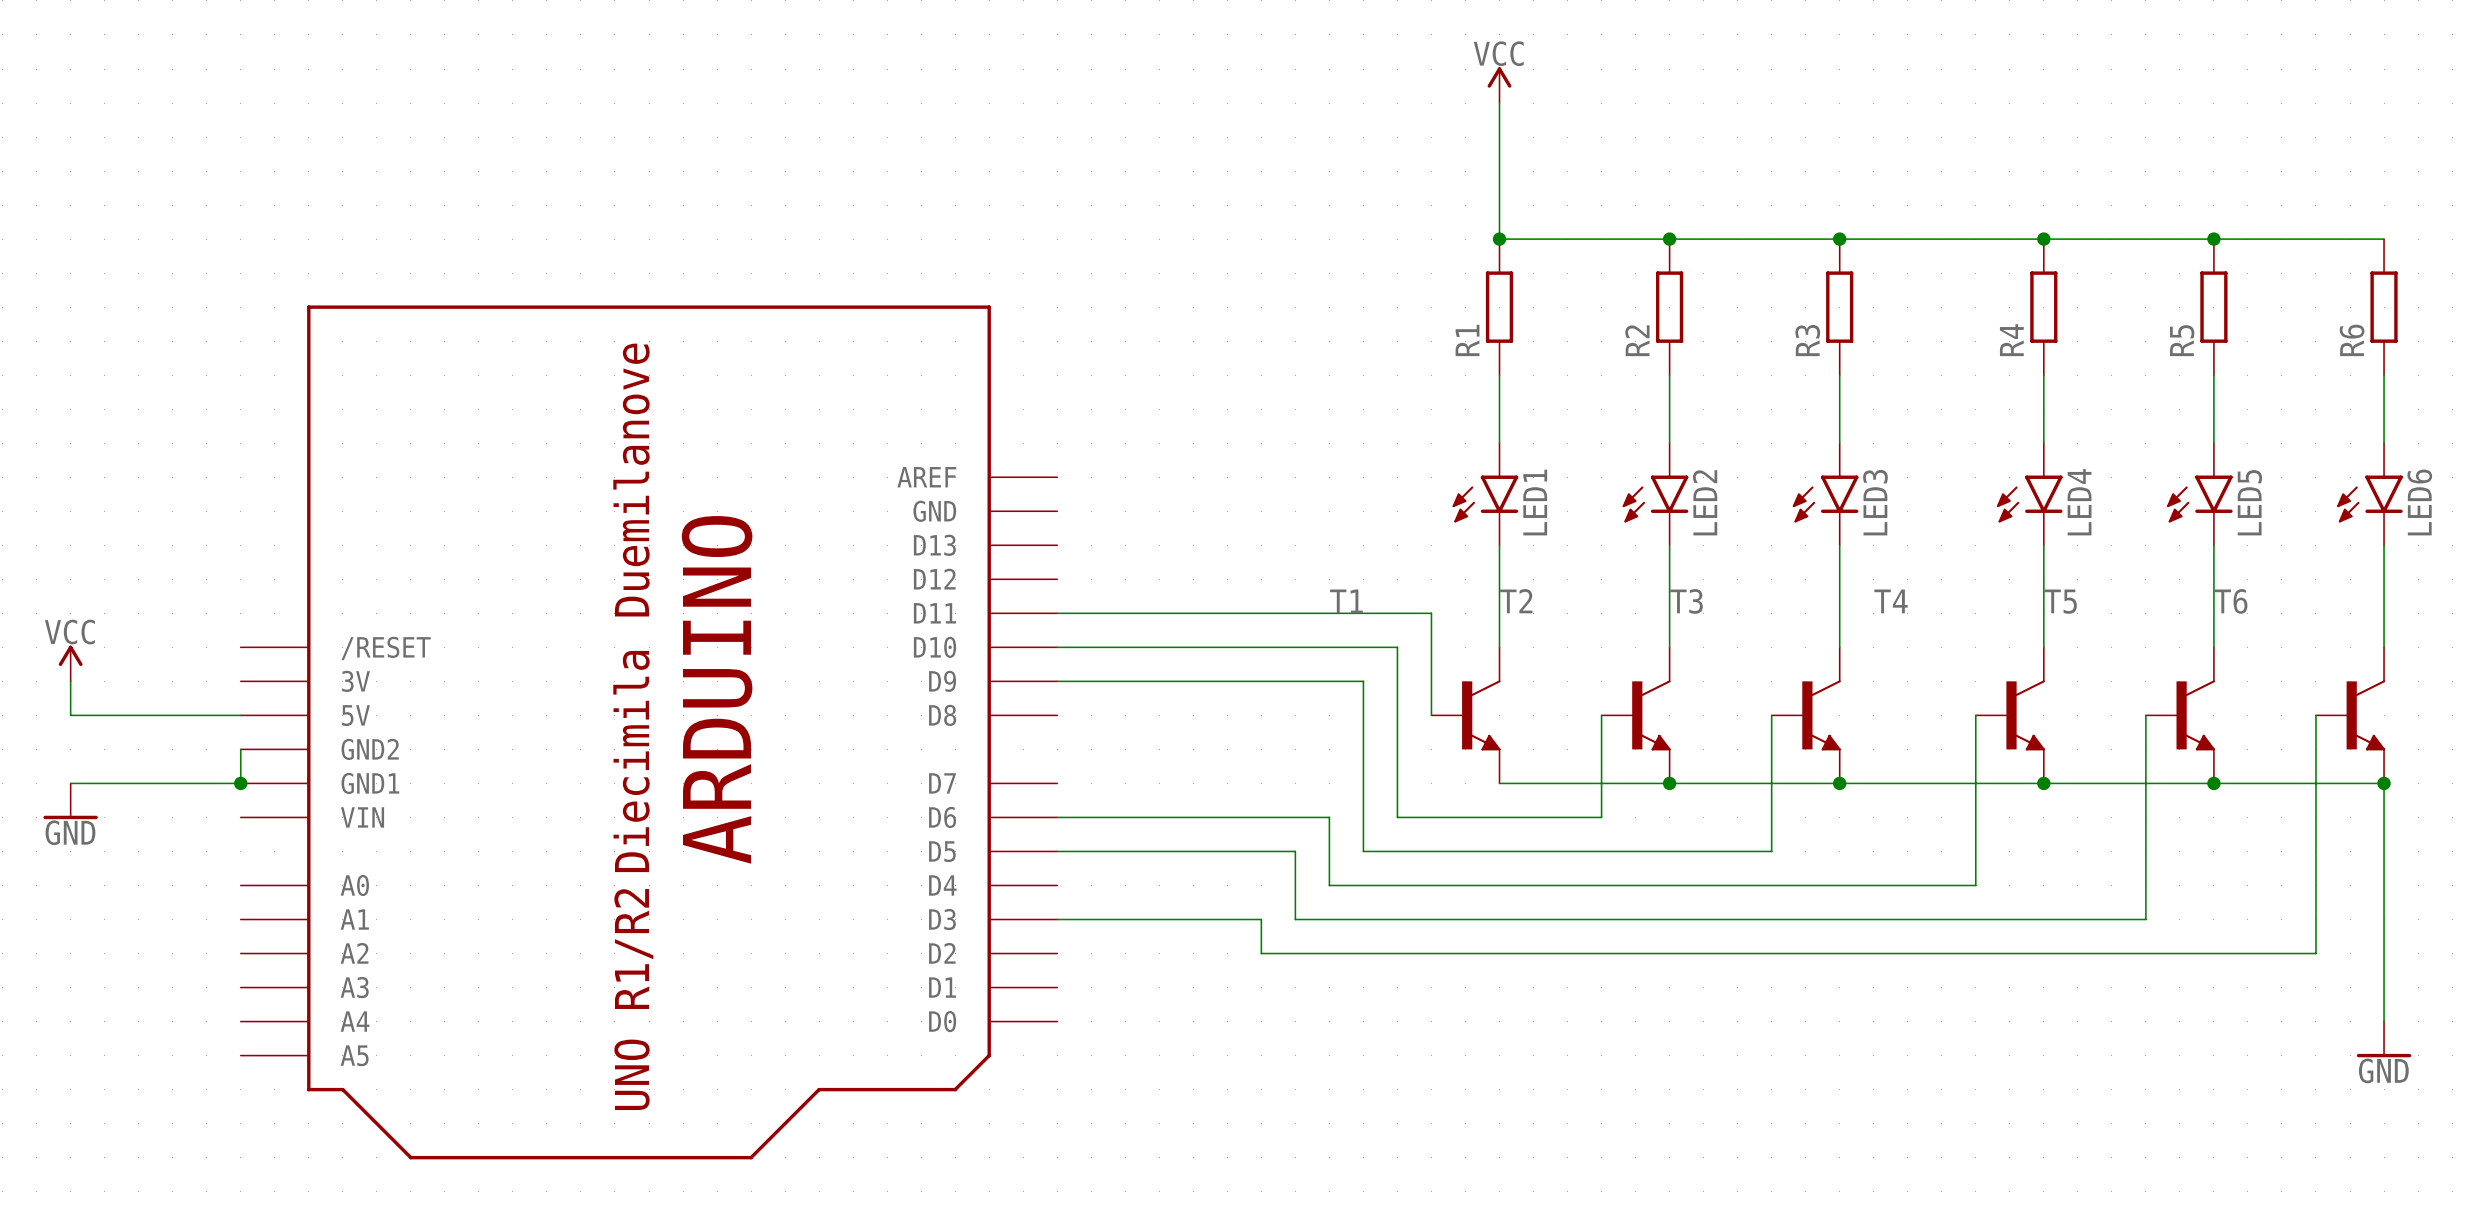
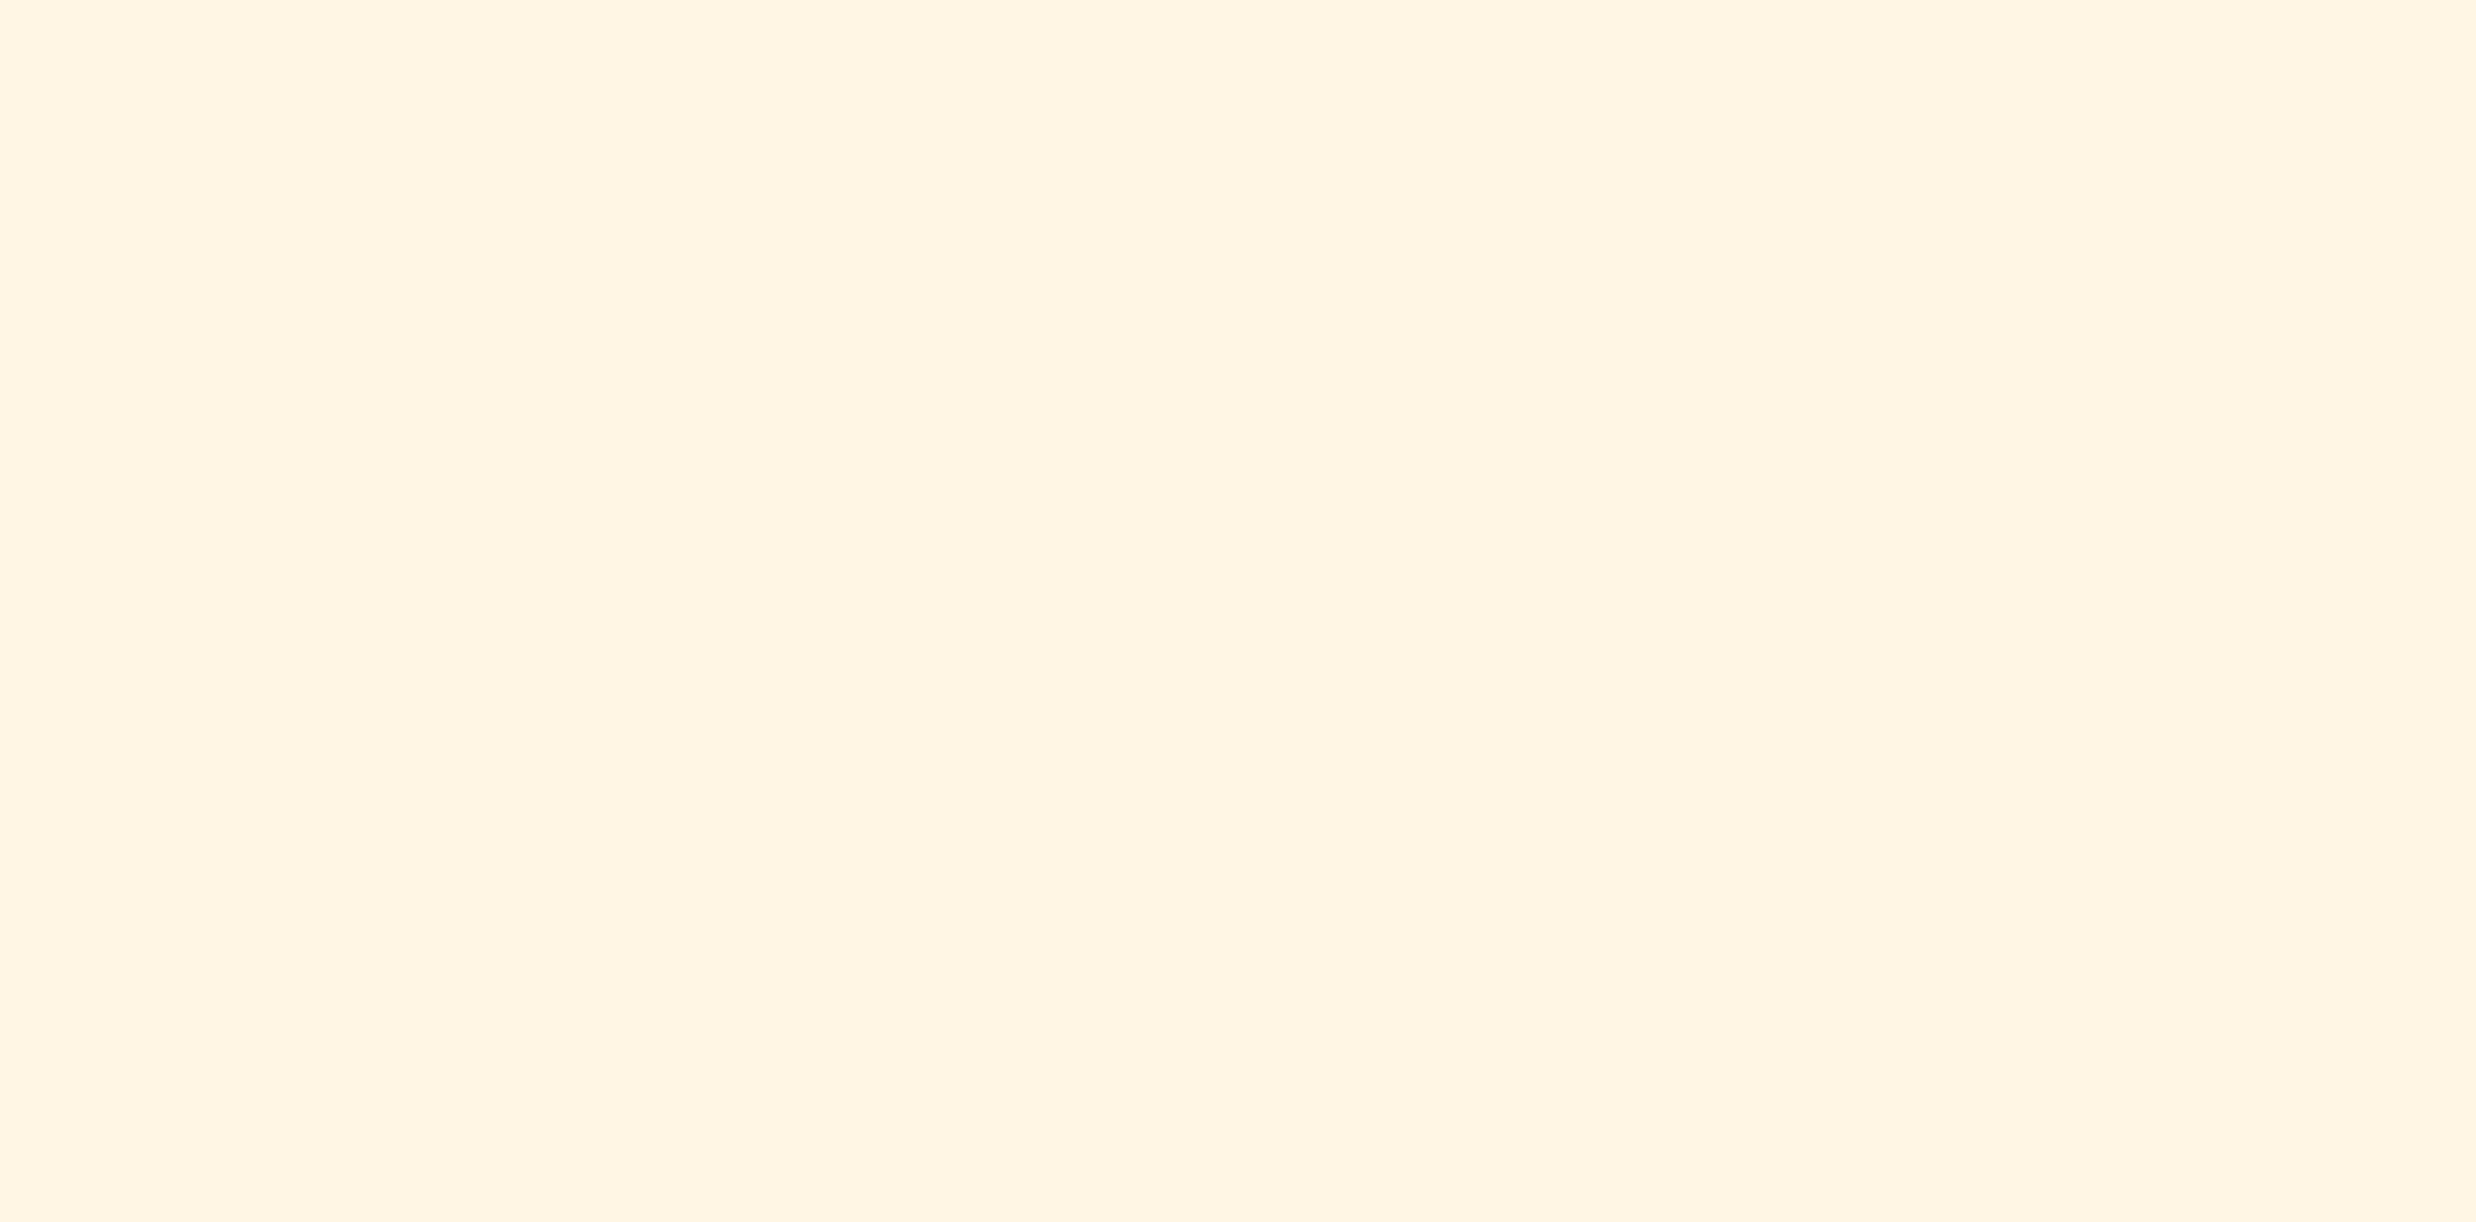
power symbol: VCC (1499, 85) -> none
wire: (1499, 103) (1499, 239) (2384, 239) -> none
junction: (1499, 239) -> none
junction: (1669, 239) -> none
junction: (1839, 239) -> none
junction: (2043, 239) -> none
junction: (2213, 239) -> none
R1: (1499, 307) -> none
R2: (1669, 307) -> none
R3: (1839, 307) -> none
R4: (2043, 307) -> none
R5: (2213, 307) -> none
R6: (2384, 307) -> none
wire: (1499, 375) (1499, 443) -> none
wire: (1669, 375) (1669, 443) -> none
wire: (1839, 375) (1839, 443) -> none
wire: (2043, 375) (2043, 443) -> none
wire: (2213, 375) (2213, 443) -> none
wire: (2384, 375) (2384, 443) -> none
LED1: (1485, 494) -> none
LED2: (1655, 494) -> none
LED3: (1825, 494) -> none
LED4: (2029, 494) -> none
LED5: (2199, 494) -> none
LED6: (2369, 494) -> none
wire: (1499, 545) (1499, 647) -> none
wire: (1669, 545) (1669, 647) -> none
wire: (1839, 545) (1839, 647) -> none
wire: (2043, 545) (2043, 647) -> none
wire: (2213, 545) (2213, 647) -> none
wire: (2384, 545) (2384, 647) -> none
wire: (1057, 613) (1431, 613) (1431, 715) -> none
wire: (1057, 647) (1397, 647) (1397, 817) (1601, 817) (1601, 715) -> none
power symbol: VCC (70, 663) -> none
wire: (70, 681) (70, 715) (240, 715) -> none
wire: (1057, 681) (1363, 681) (1363, 851) (1771, 851) (1771, 715) -> none
T1: (1465, 715) -> none
T2: (1636, 715) -> none
T3: (1806, 715) -> none
wire: (1975, 715) (1975, 885) (1329, 885) (1329, 817) (1057, 817) -> none
T4: (2010, 715) -> none
wire: (2145, 715) (2145, 919) (1295, 919) (1295, 851) (1057, 851) -> none
T5: (2180, 715) -> none
wire: (2315, 715) (2315, 953) (1261, 953) (1261, 919) (1057, 919) -> none
T6: (2350, 715) -> none
part: (649, 732) -> none
wire: (240, 749) (240, 783) (70, 783) -> none
junction: (240, 783) -> none
wire: (1499, 783) (2384, 783) (2384, 1021) -> none
junction: (1669, 783) -> none
junction: (1839, 783) -> none
junction: (2043, 783) -> none
junction: (2213, 783) -> none
junction: (2384, 783) -> none
power symbol: GND (70, 801) -> none
power symbol: GND (2384, 1039) -> none

